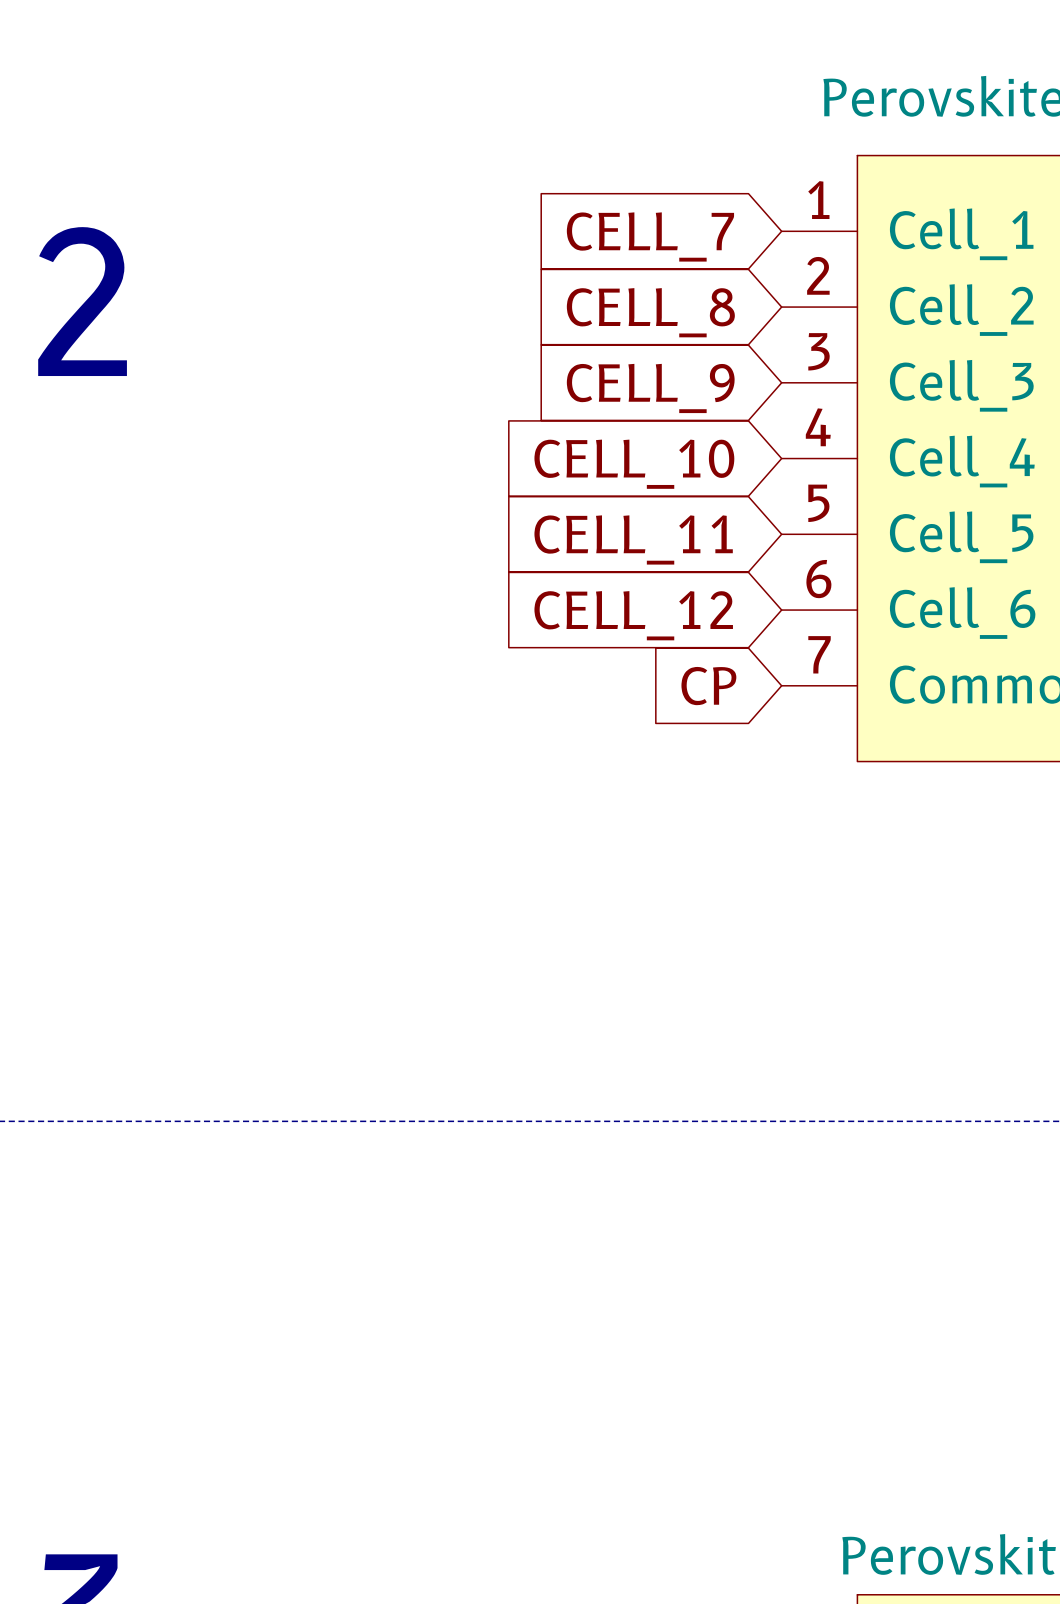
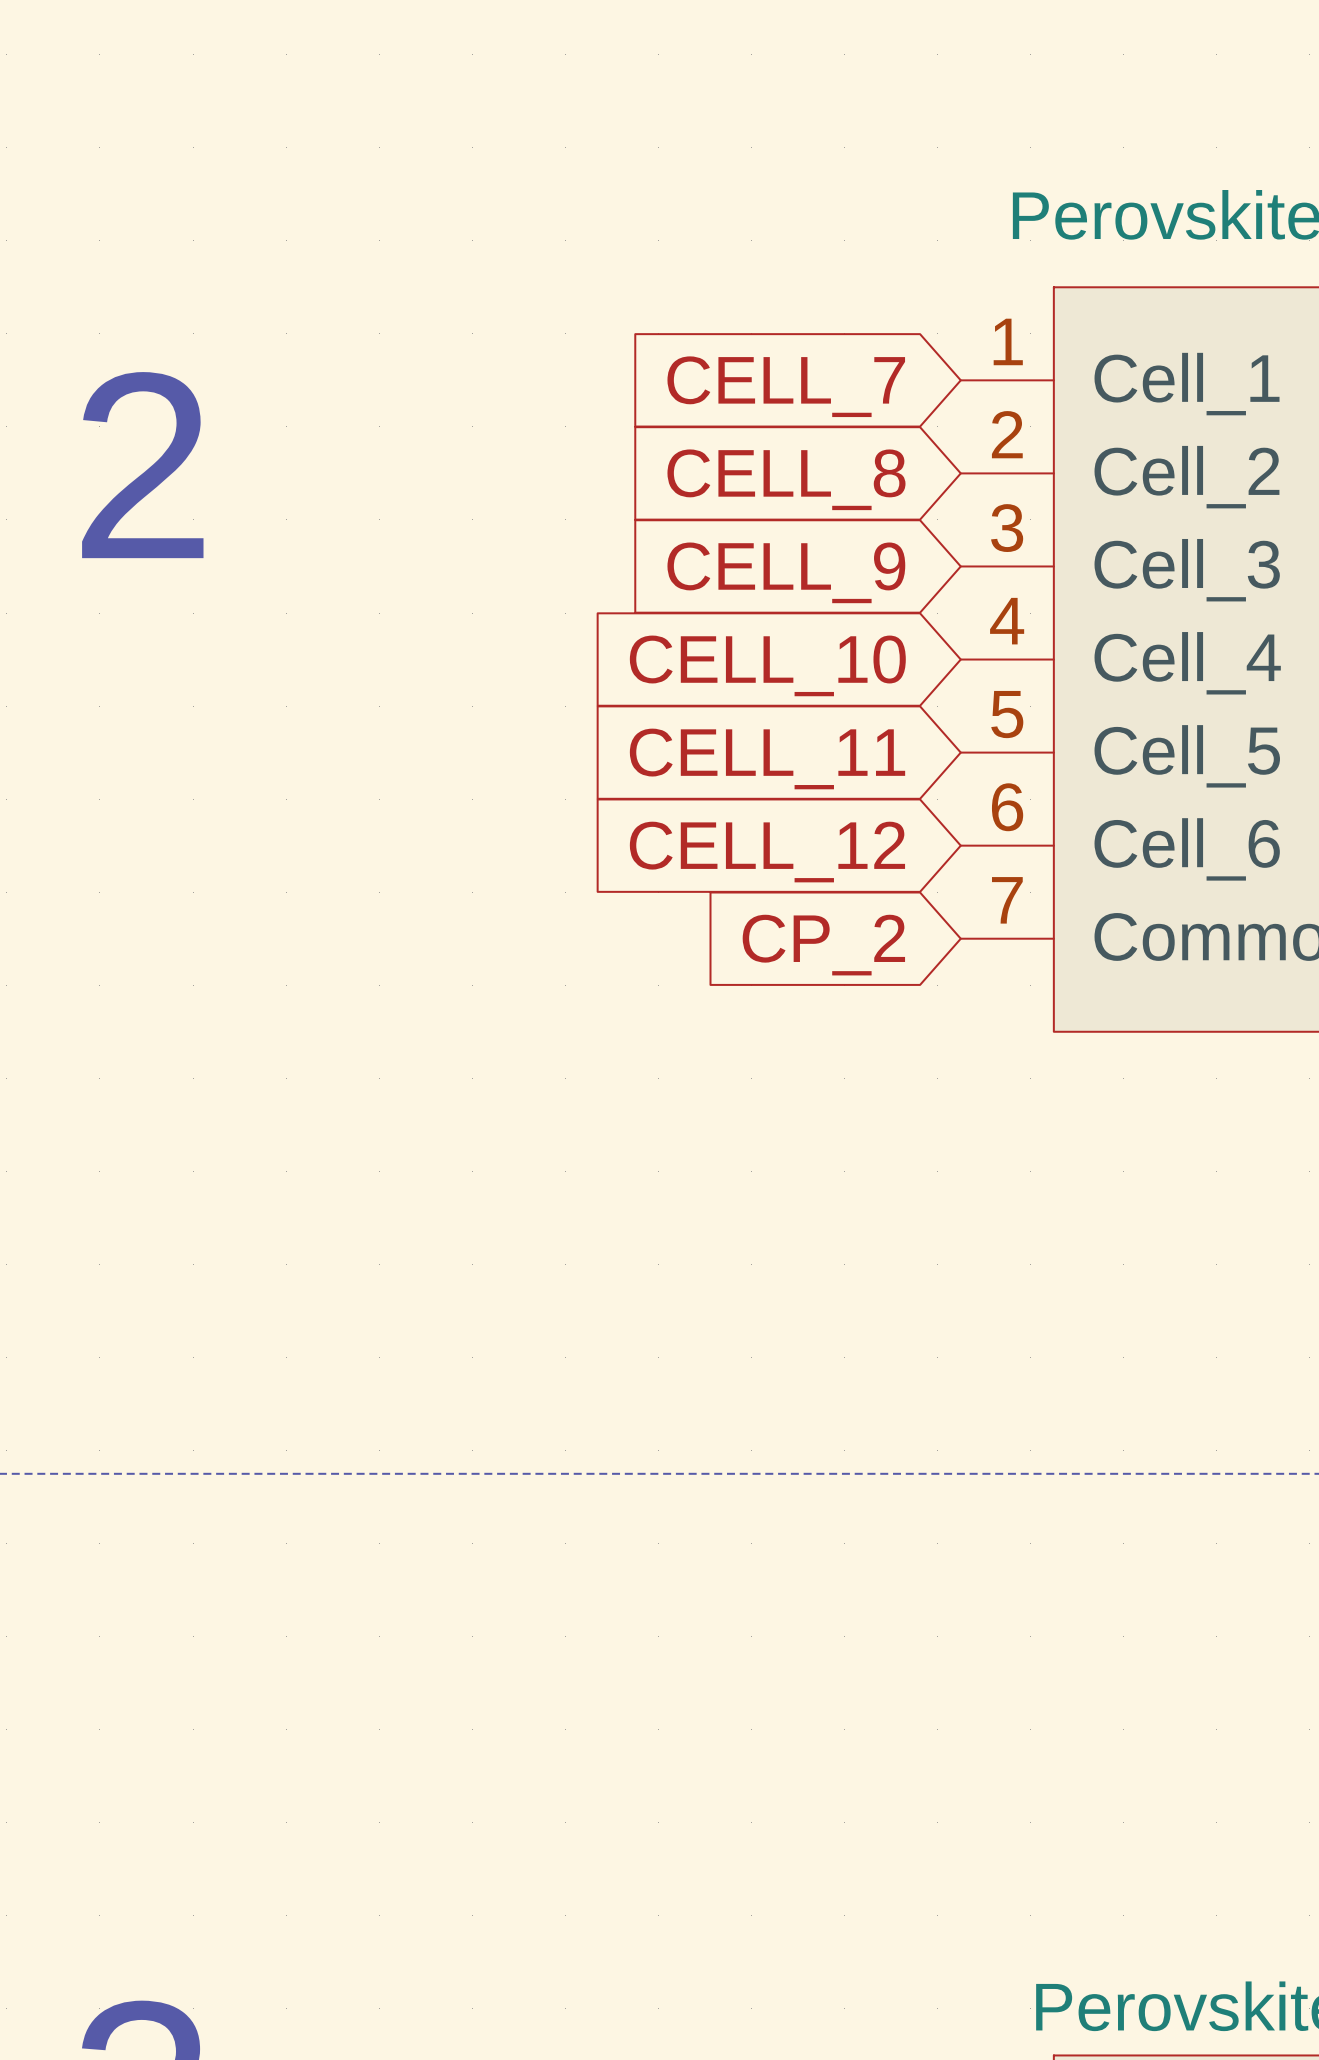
global label: CP (708, 686) -> CP_2 (823, 945)

